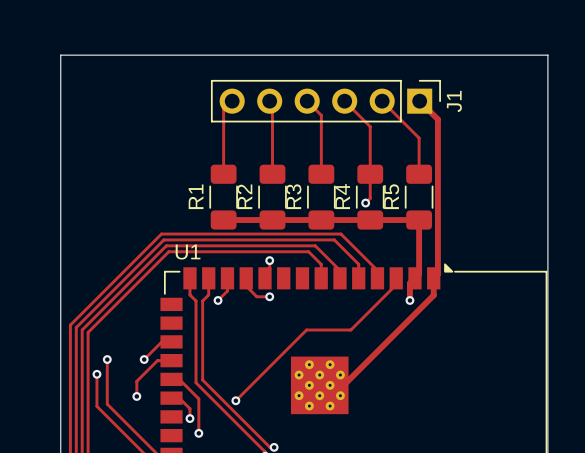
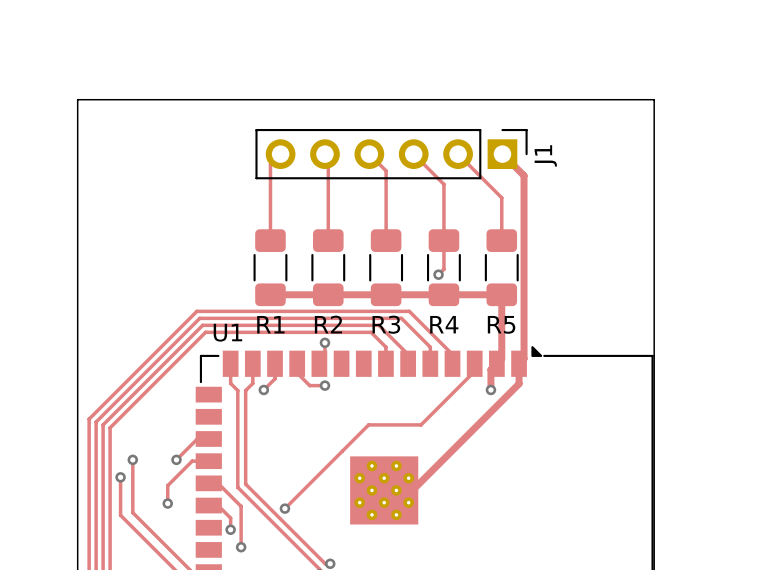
R1 name rotation: 0° (196, 196) -> 90° clockwise (270, 324)
R1 name position: R1 (196, 196) -> R1 (270, 324)
R2 name rotation: 0° (244, 196) -> 90° clockwise (328, 324)
R2 name position: R2 (244, 196) -> R2 (328, 324)
R3 name rotation: 0° (293, 196) -> 90° clockwise (386, 324)
R3 name position: R3 (293, 196) -> R3 (386, 324)
R4 name rotation: 0° (342, 196) -> 90° clockwise (444, 324)
R4 name position: R4 (342, 196) -> R4 (444, 324)
R5 name rotation: 0° (391, 196) -> 90° clockwise (501, 324)
R5 name position: R5 (391, 196) -> R5 (501, 324)

